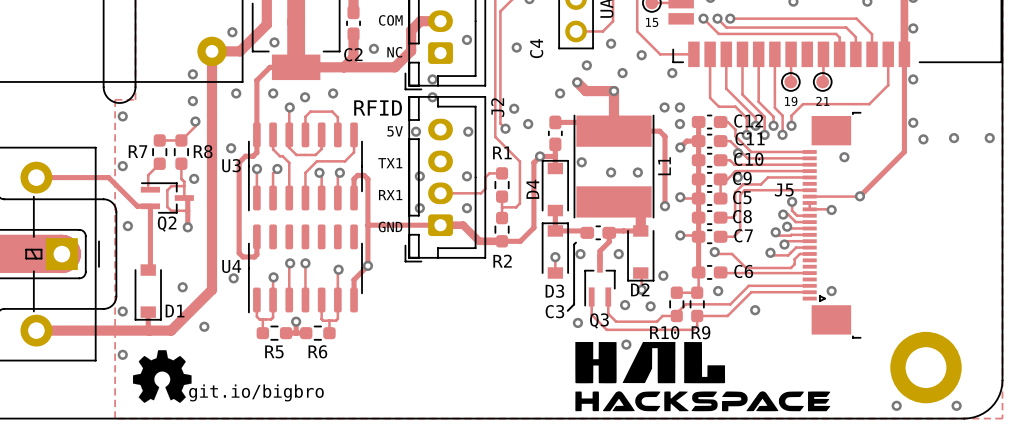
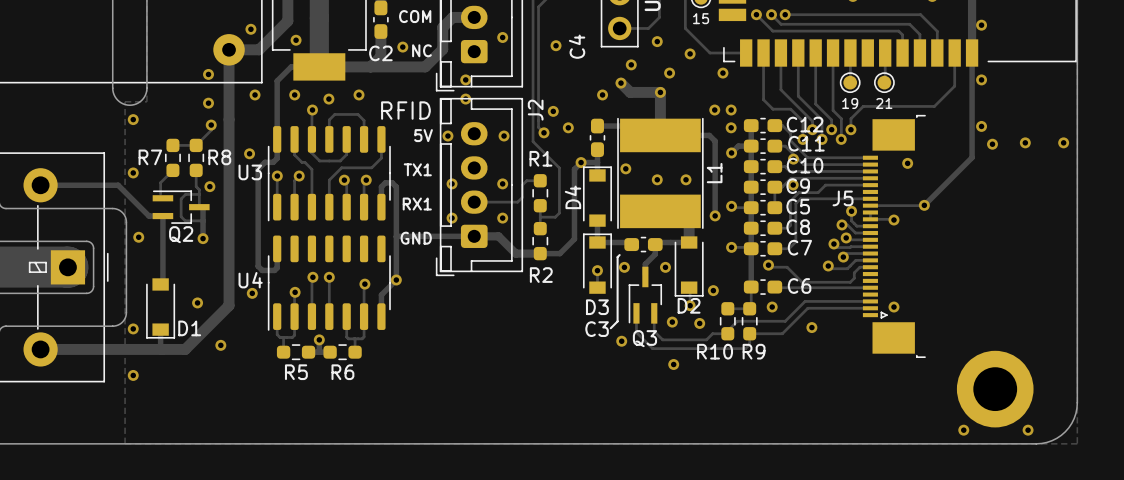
drawing: [575, 342, 831, 412] -> none
drawing: [132, 350, 192, 403] -> none
text: git.io/bigbro (256, 392) -> none

